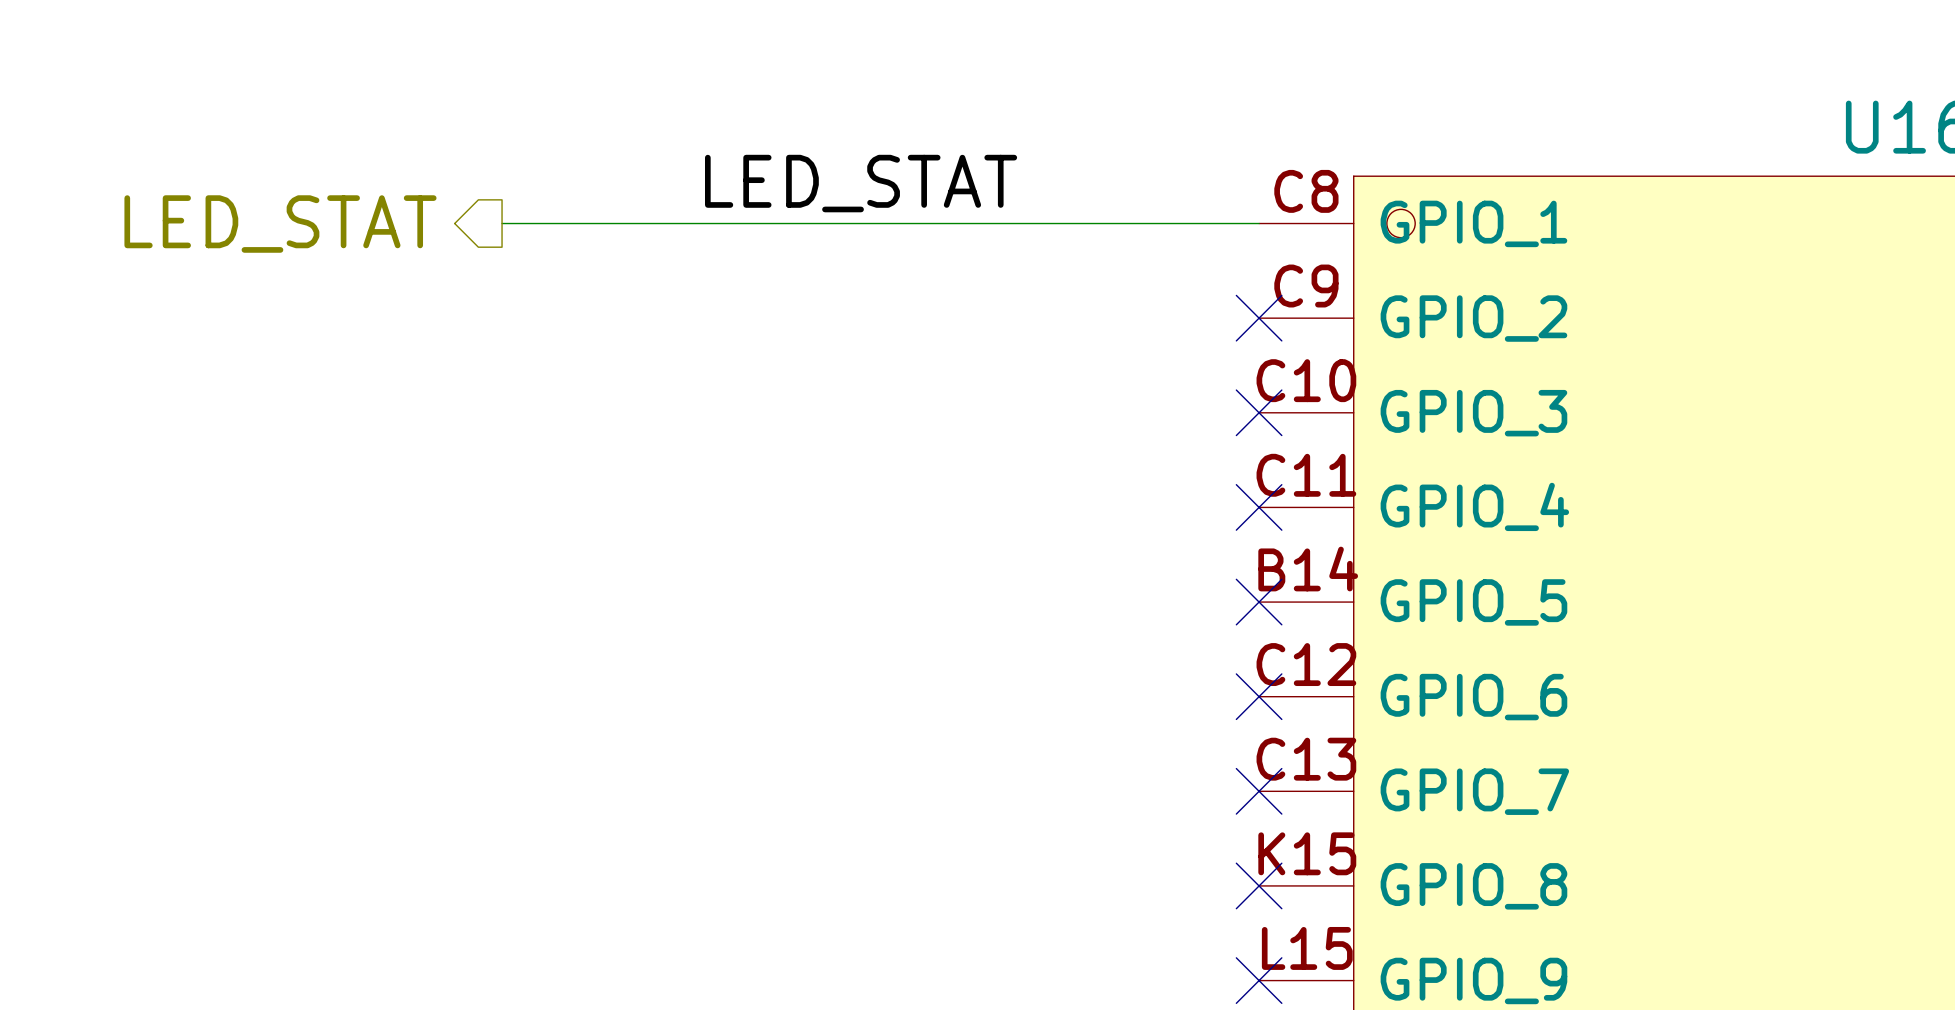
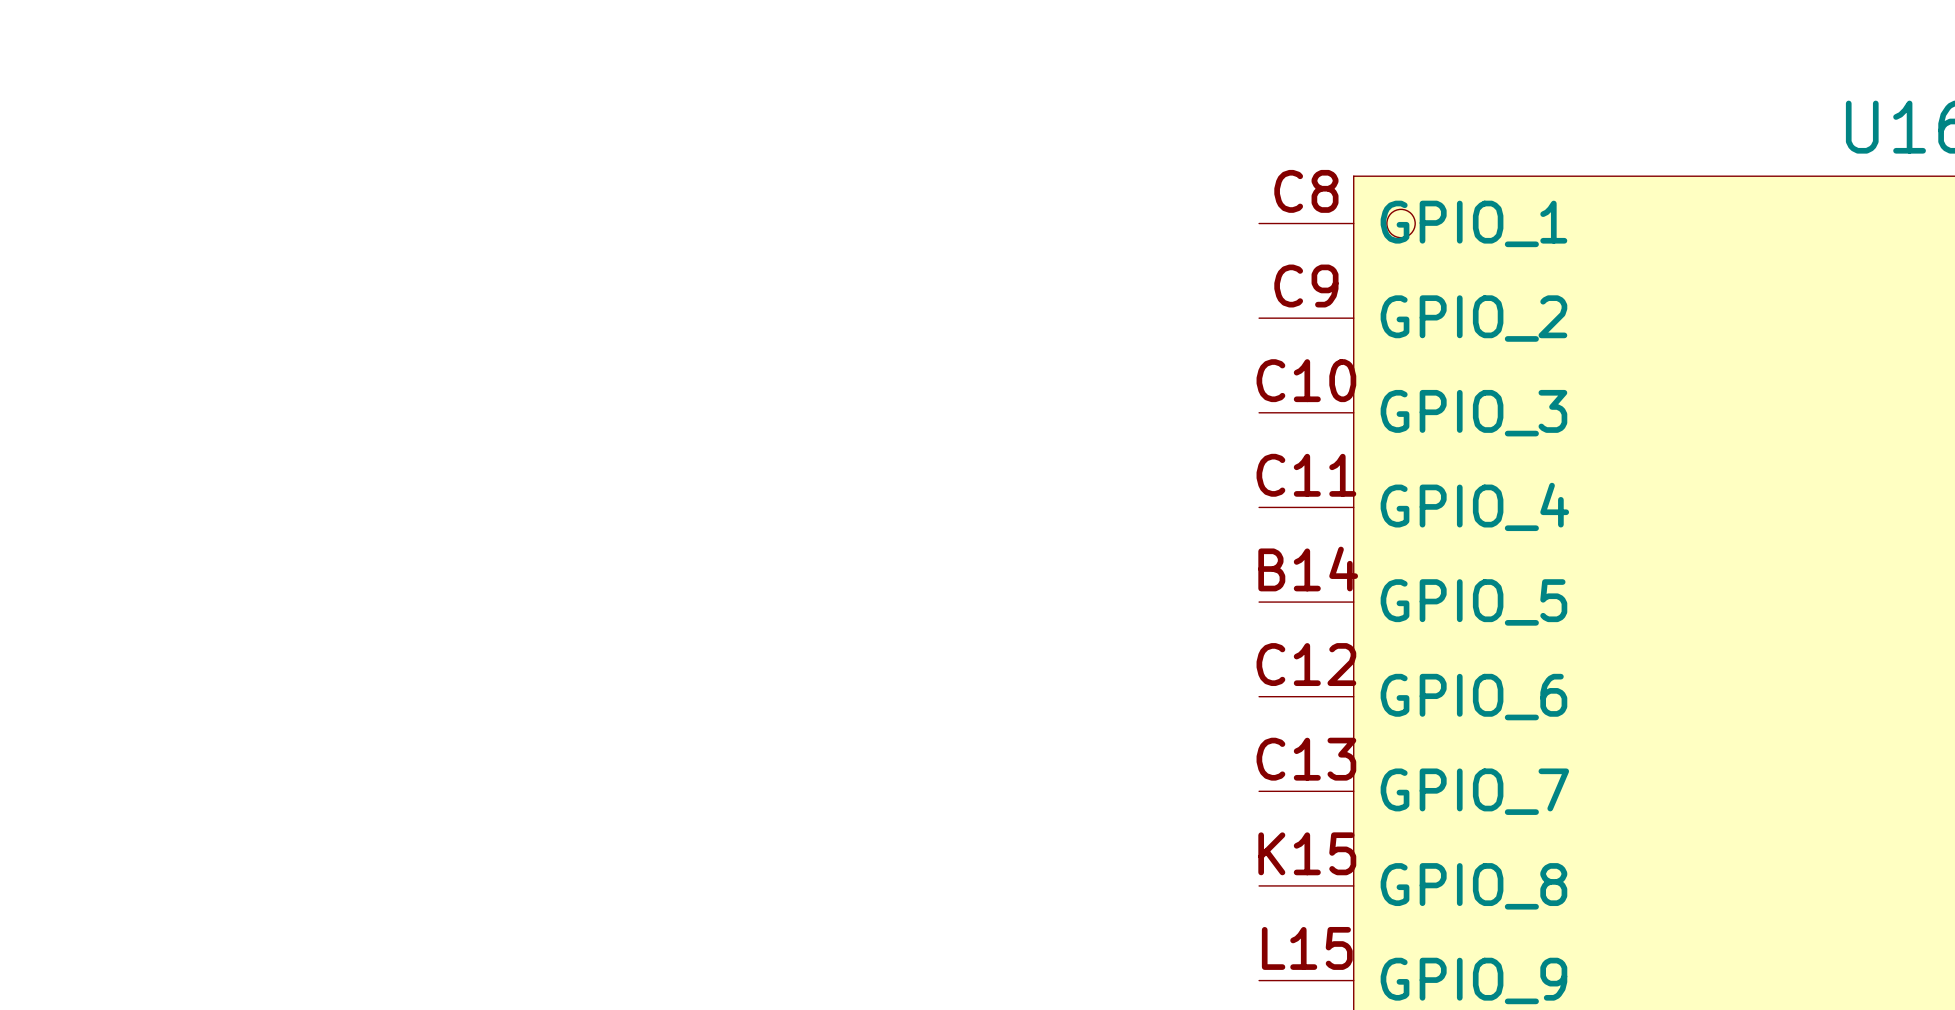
label: LED_STAT (861, 183) -> none
wire: (502, 223) (1259, 223) -> none
hierarchical label: LED_STAT (280, 224) -> none
no-connect mark: (1259, 318) -> none
no-connect mark: (1259, 412) -> none
no-connect mark: (1259, 507) -> none
no-connect mark: (1259, 602) -> none
no-connect mark: (1259, 696) -> none
no-connect mark: (1259, 791) -> none
no-connect mark: (1259, 885) -> none
no-connect mark: (1259, 980) -> none

